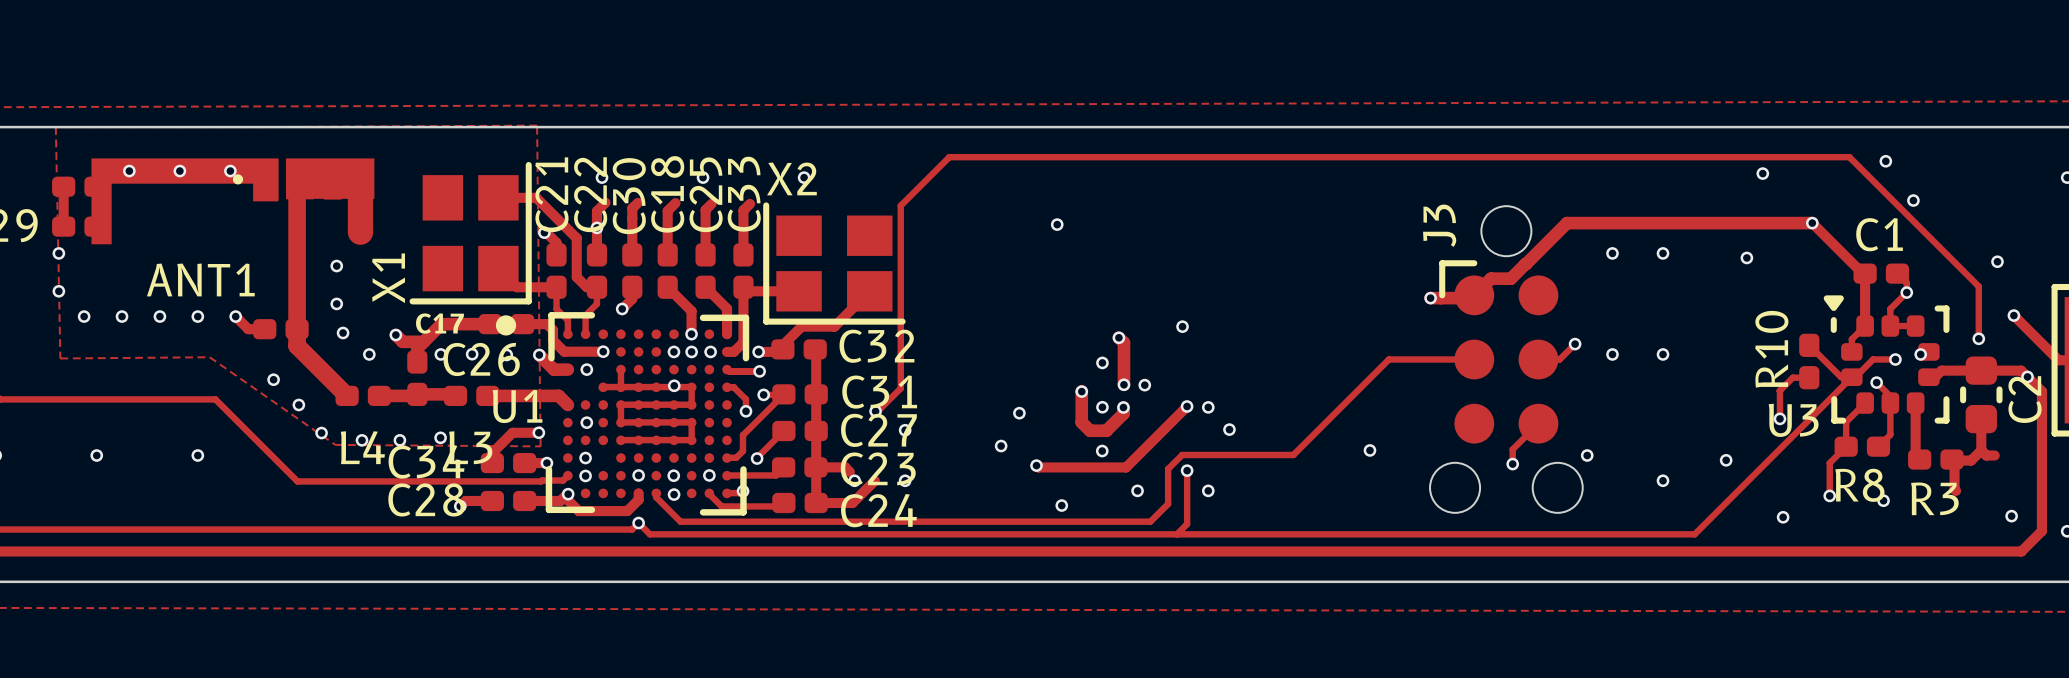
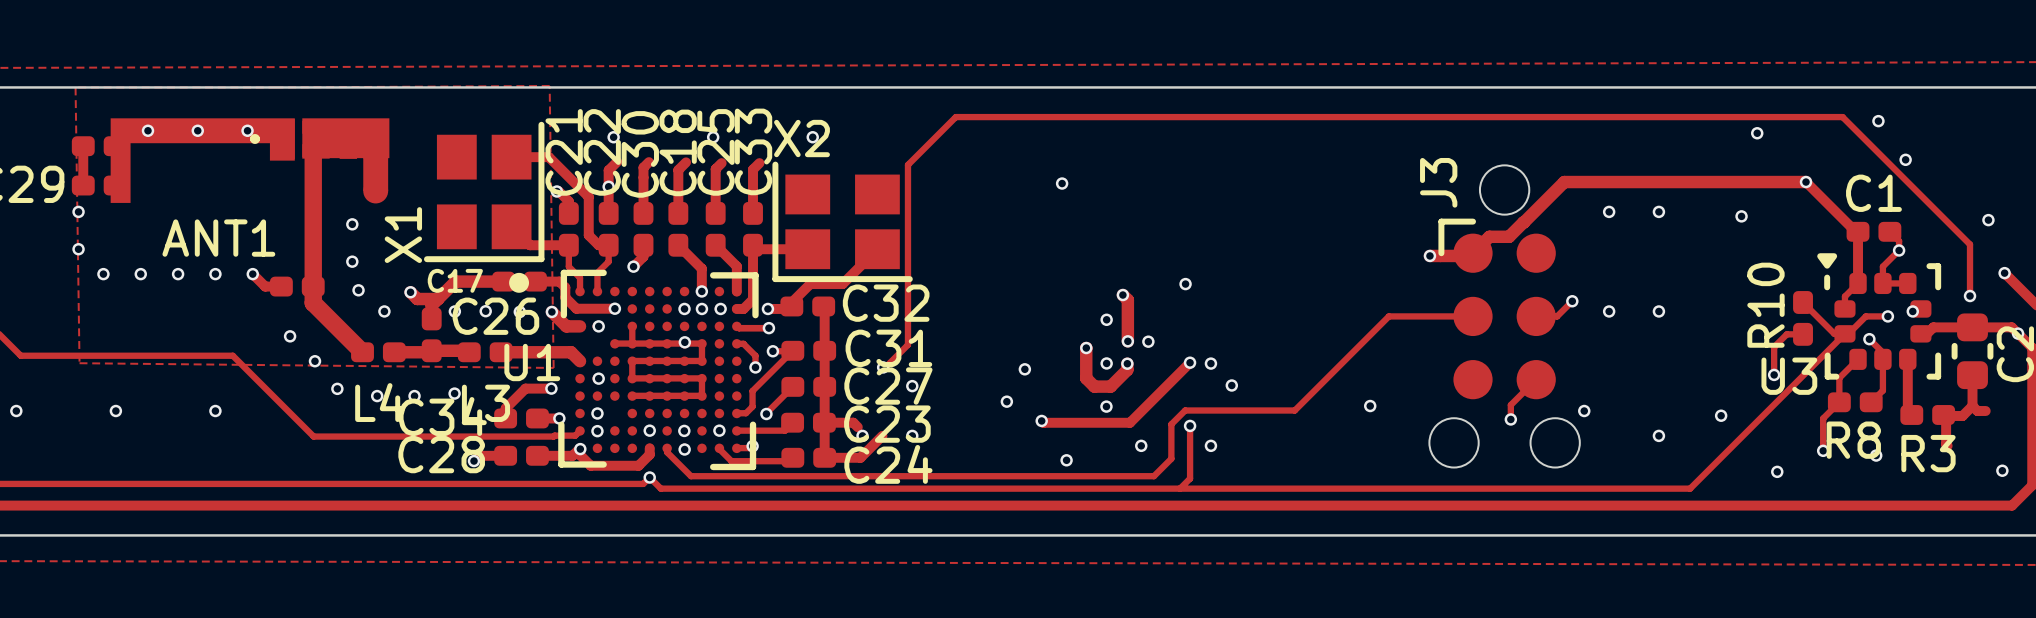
zone outline: (537, 125) (540, 446) (335, 444) (209, 357) (60, 358) (55, 127) -> (549, 85) (553, 367) (79, 363) (75, 87)

